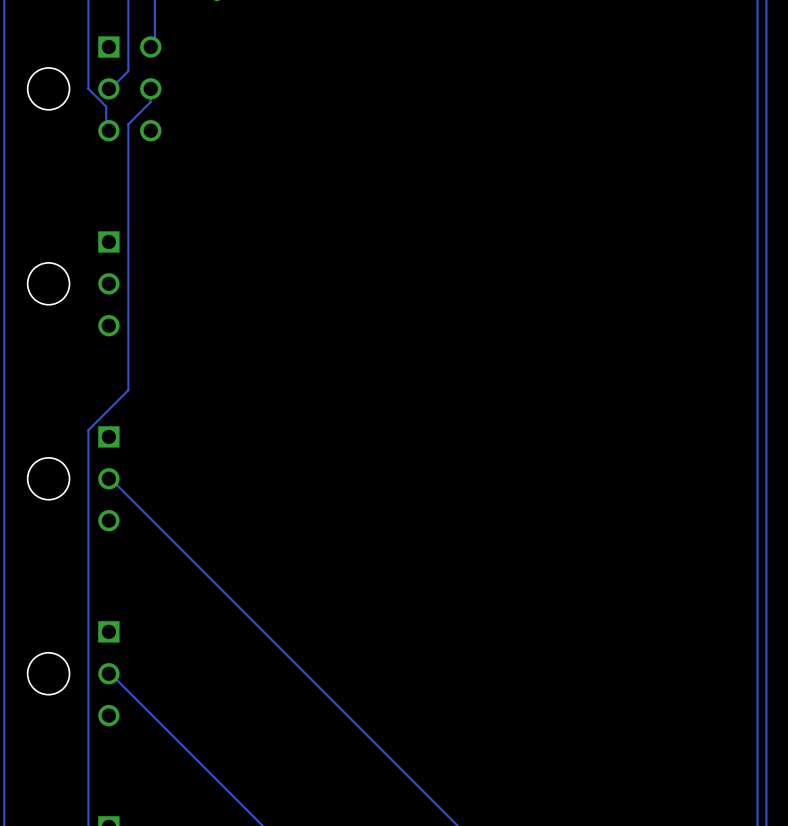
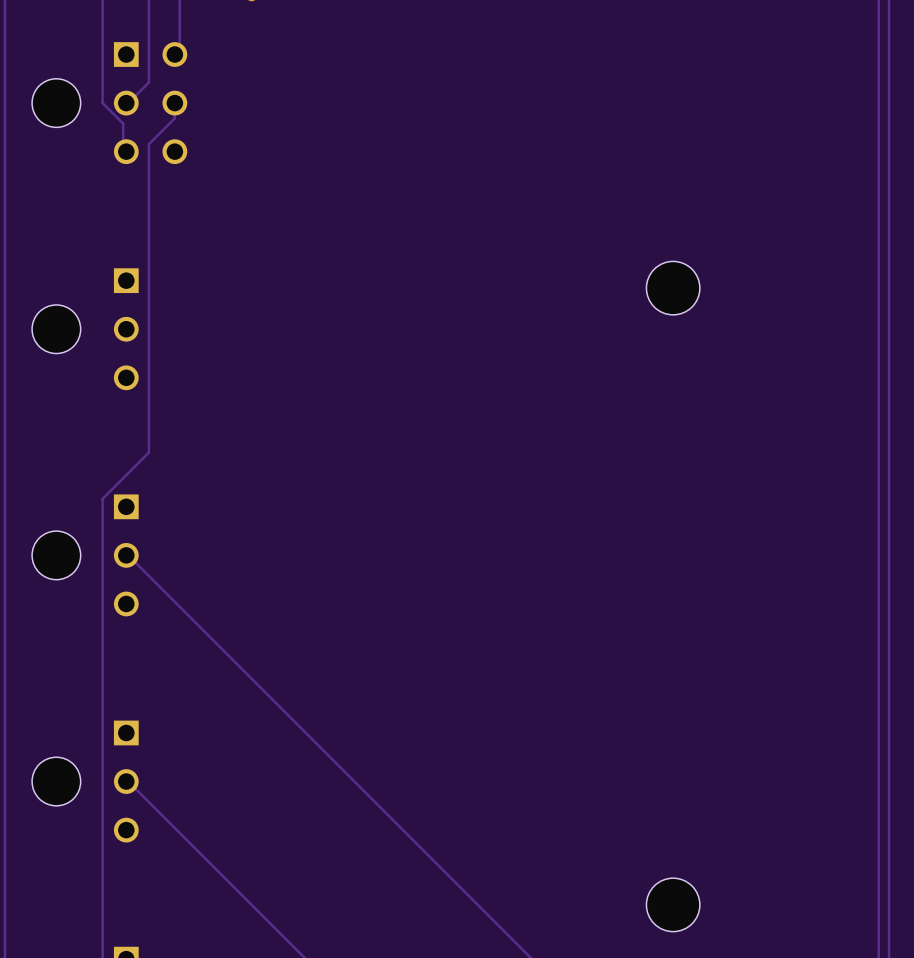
hole: none -> (673, 288)
hole: none -> (673, 904)

